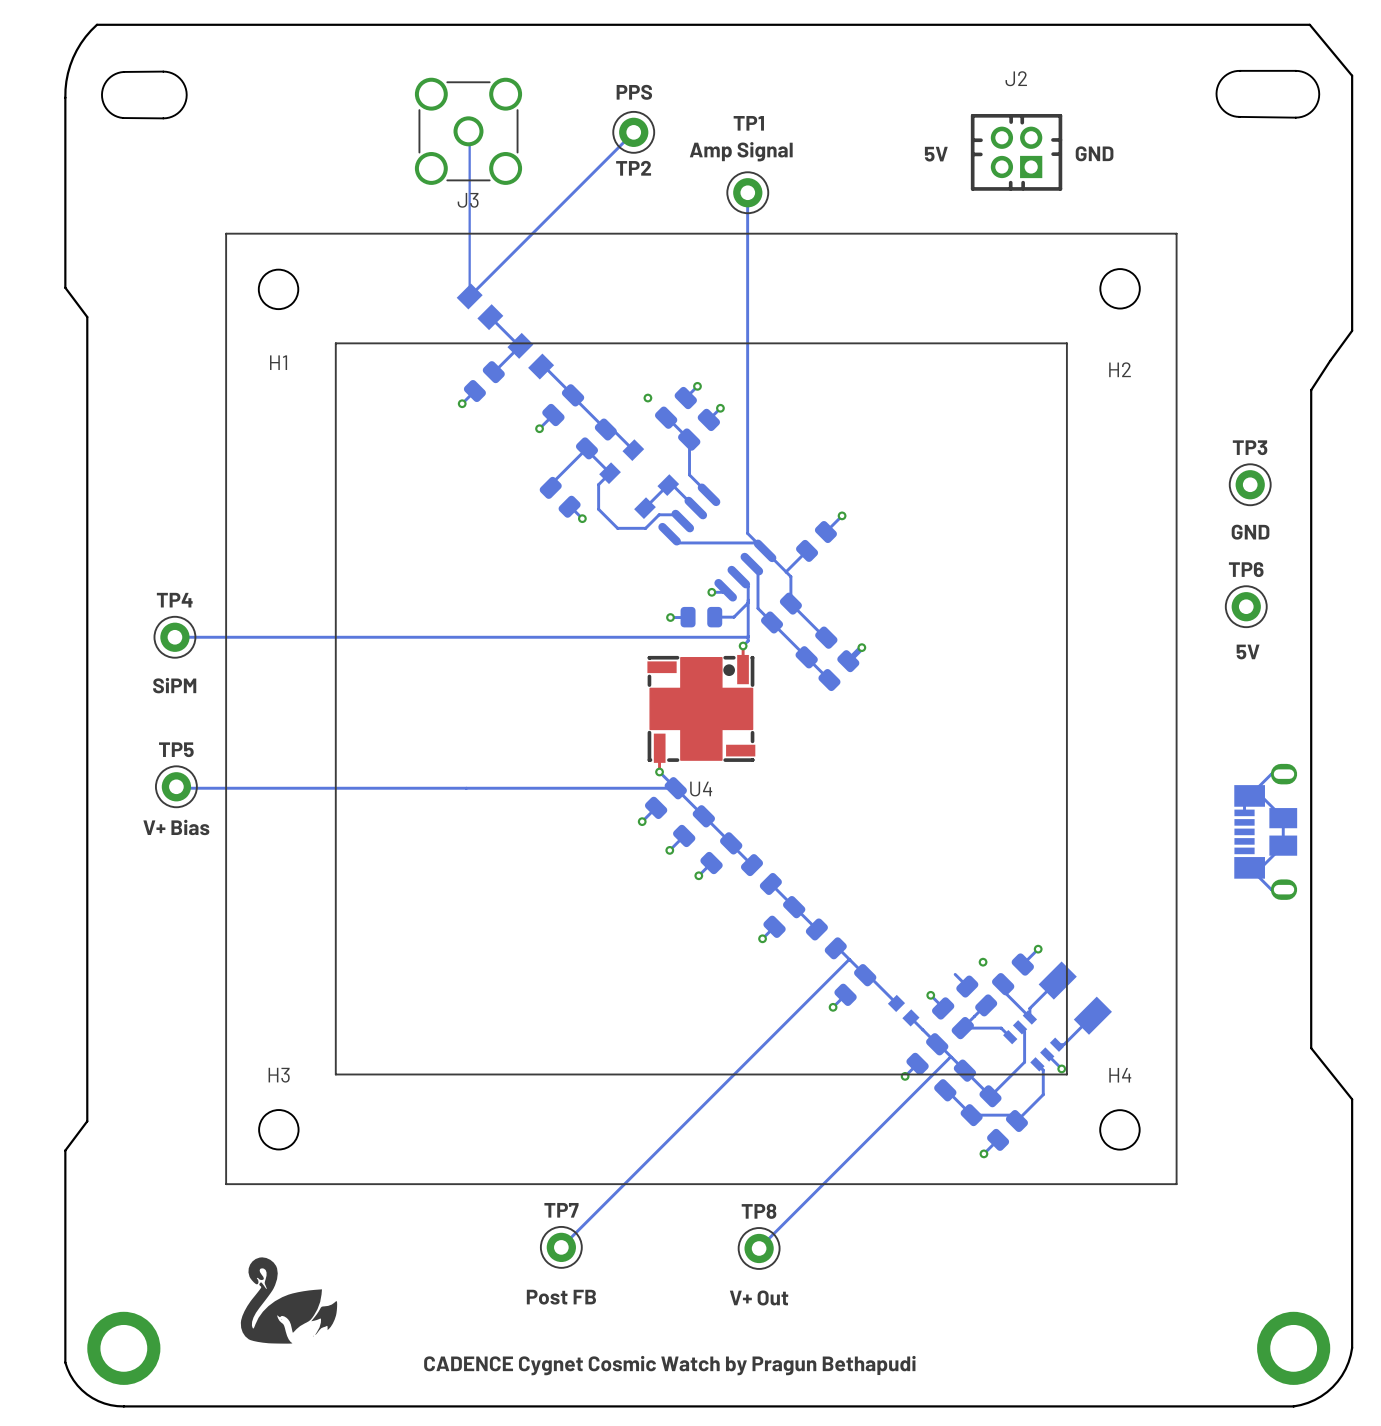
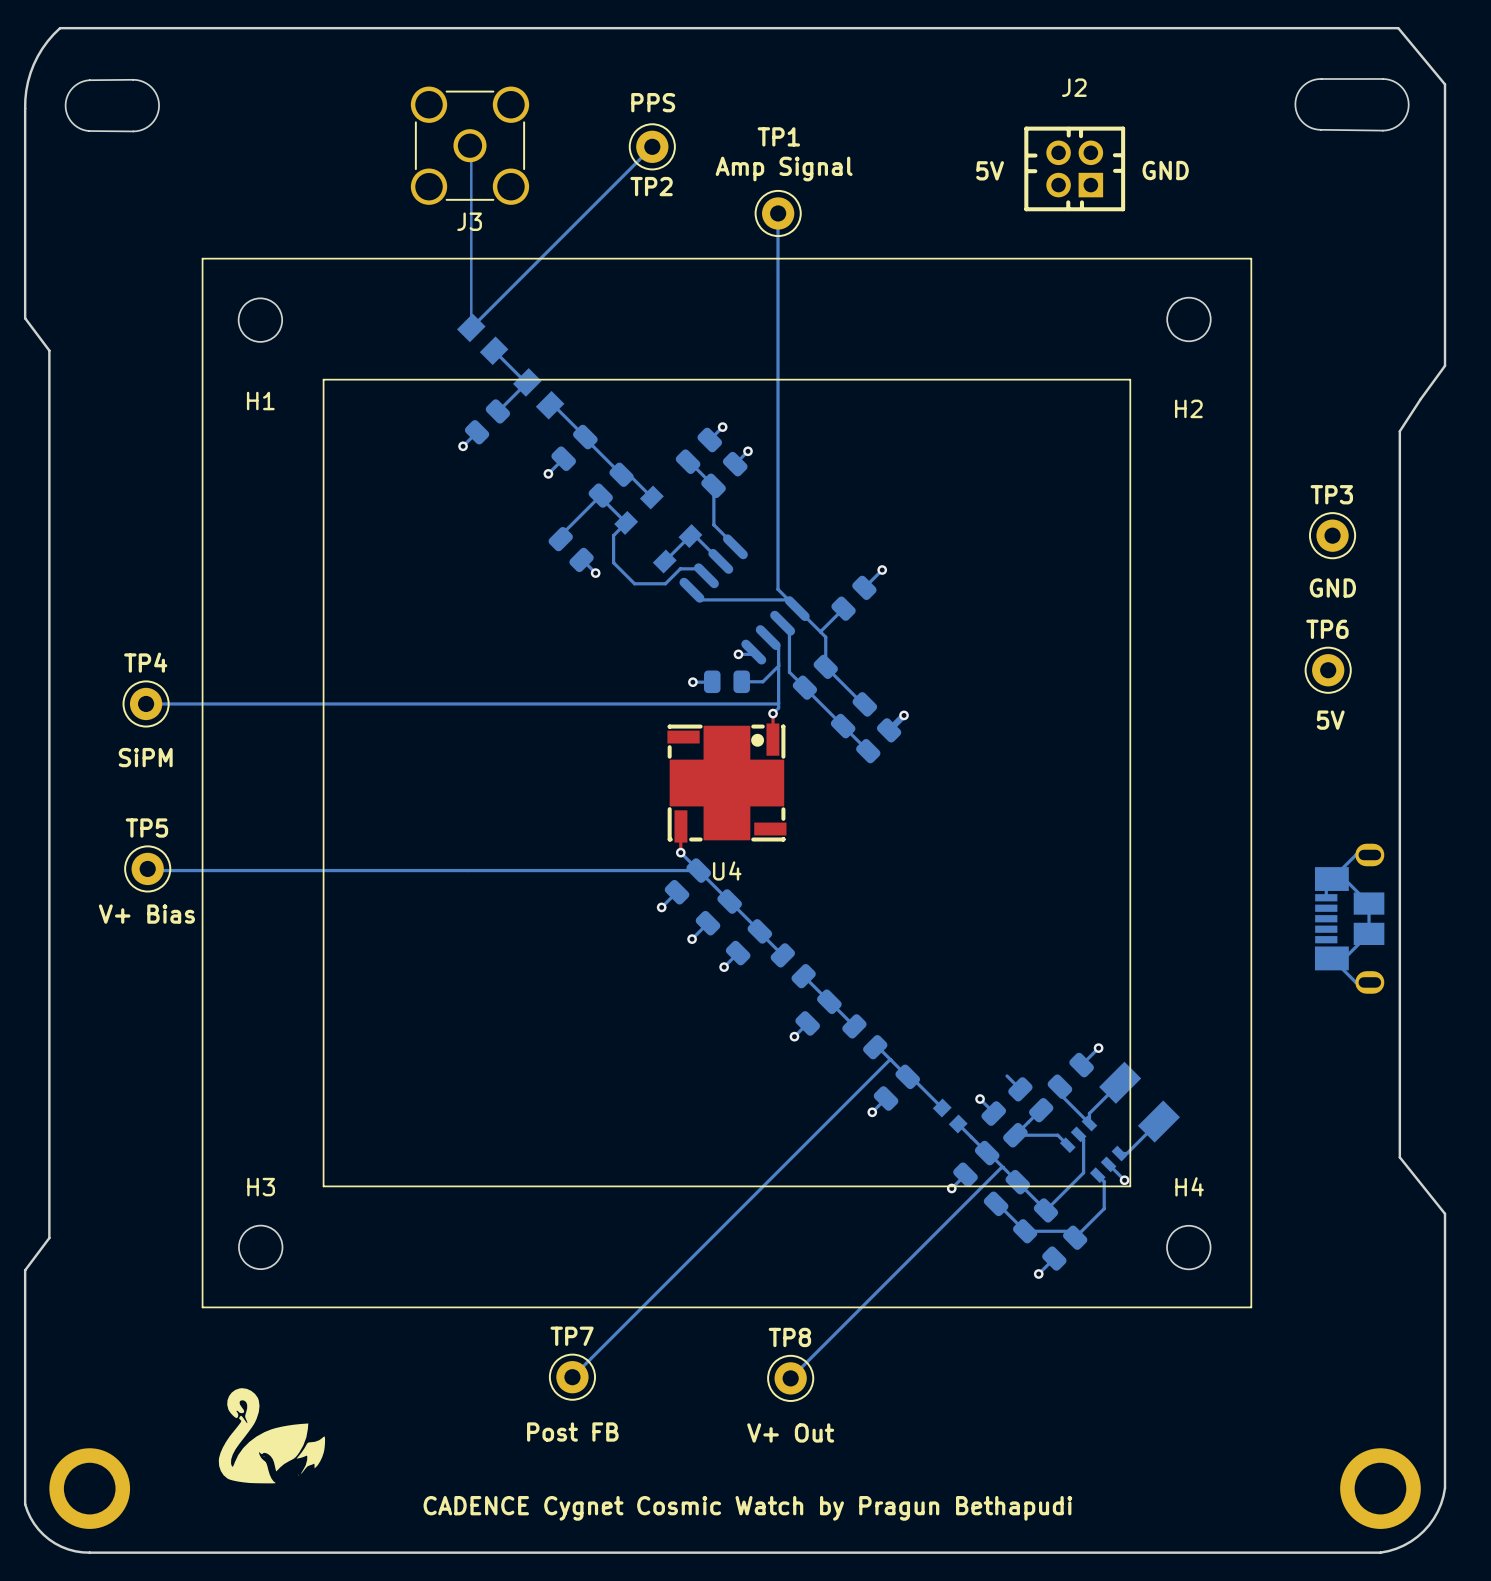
via: (647, 398) -> none
via: (983, 962) -> none

